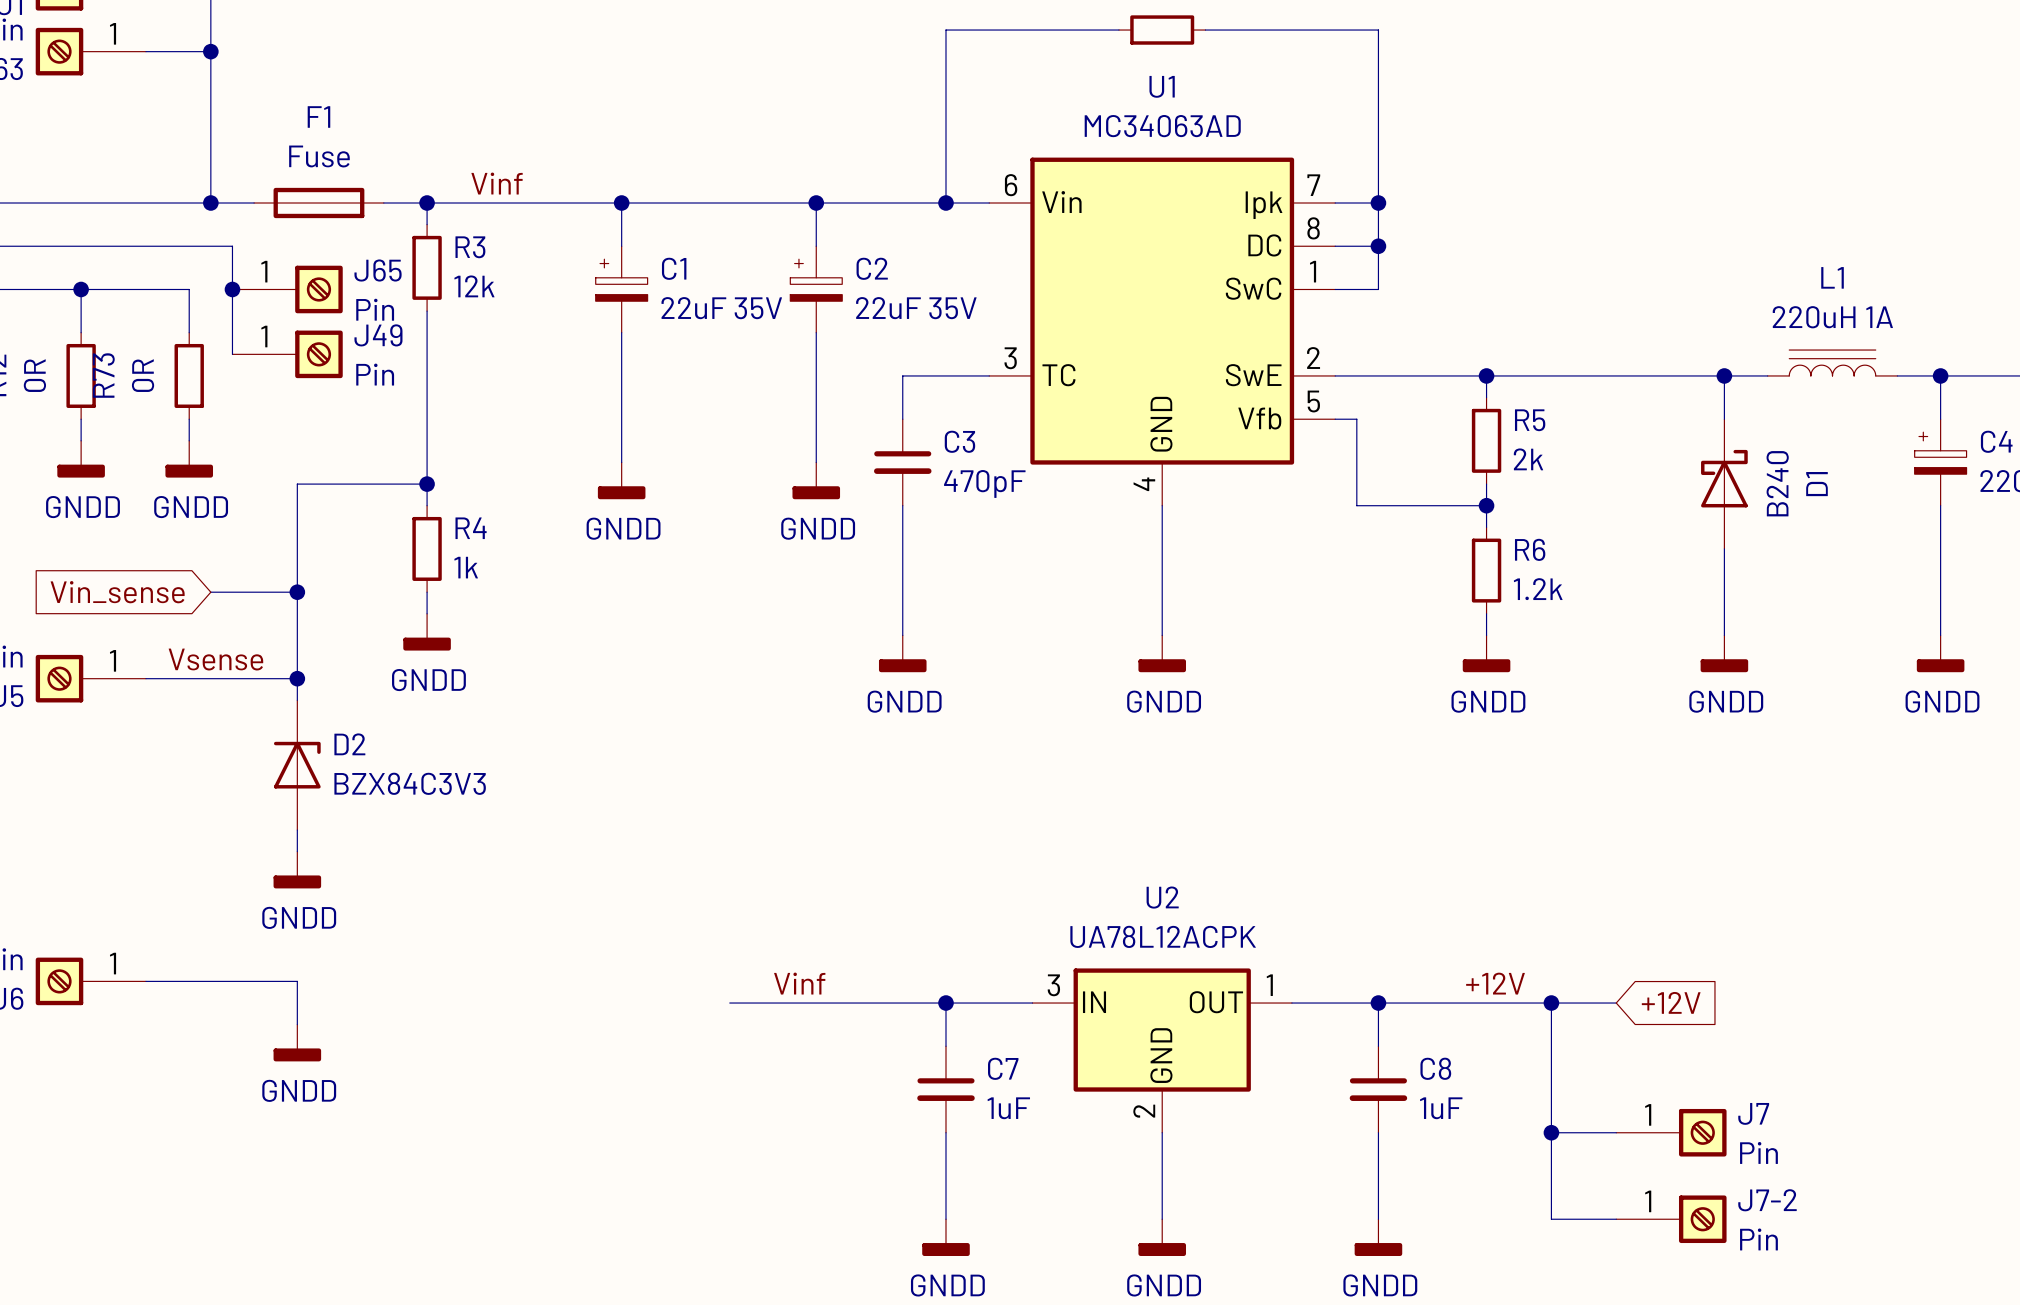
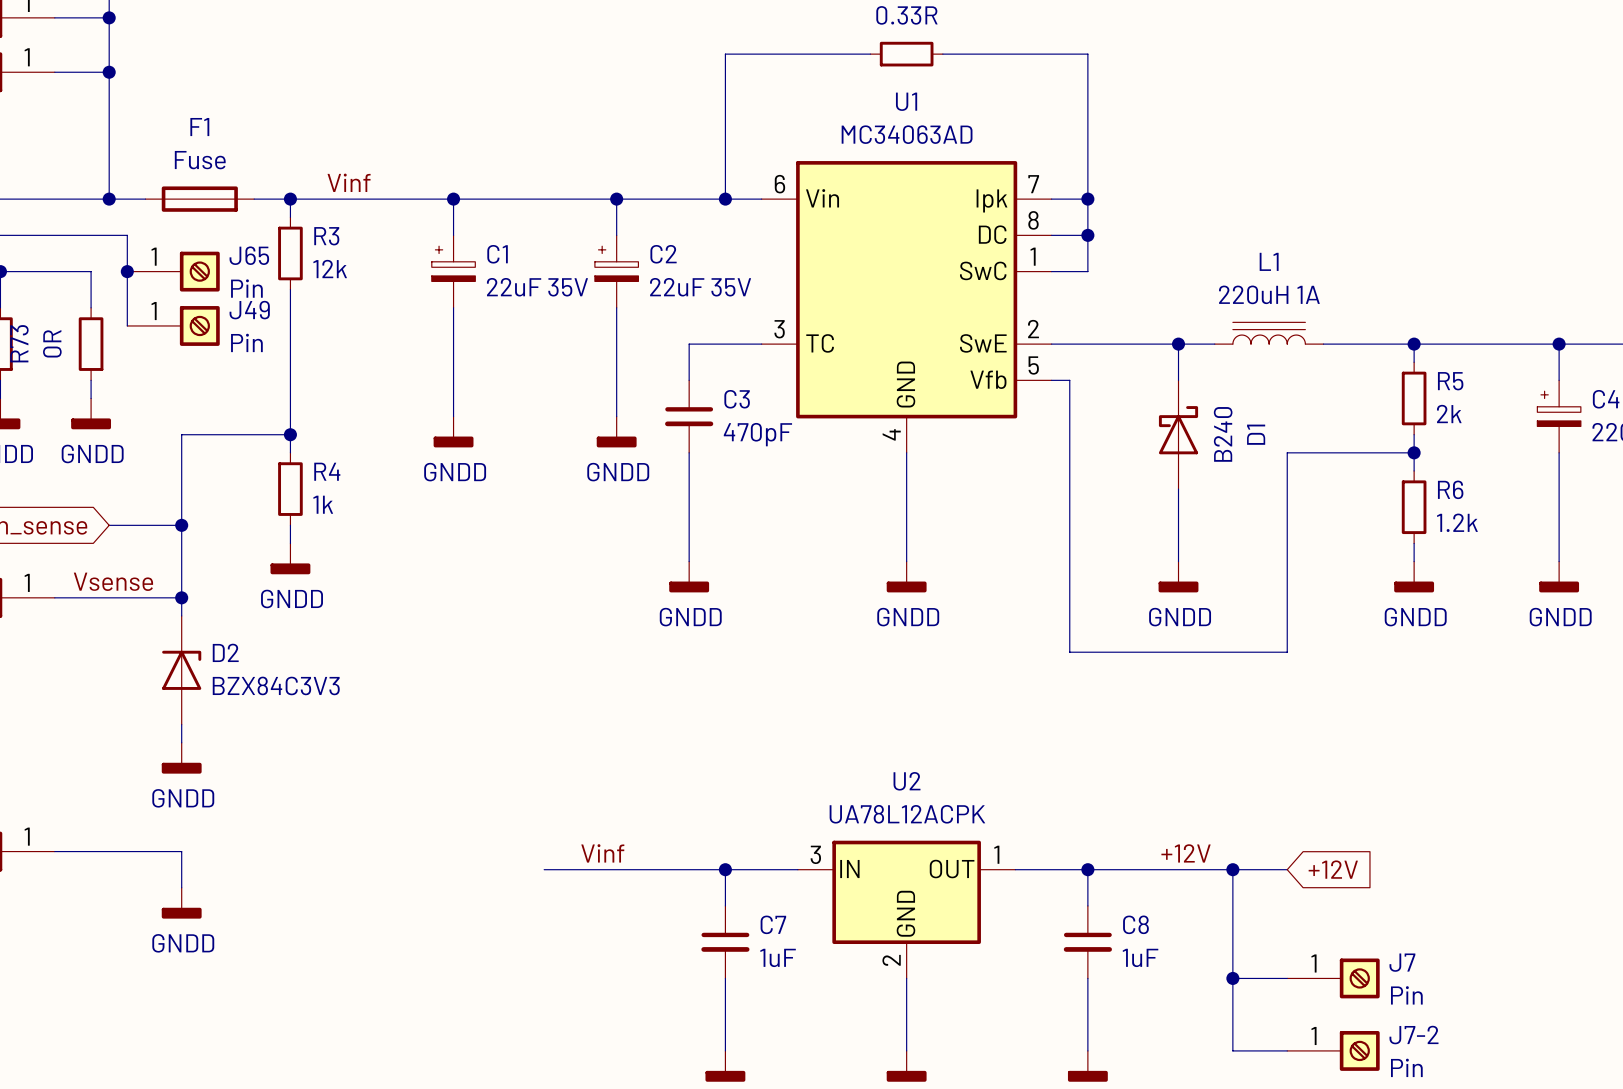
L1 position: (1832, 363) -> (1269, 333)
wire: (1529, 375) (1659, 375) -> none
wire: (1724, 375) (1724, 419) -> (1414, 434) (1414, 470)
junction position: (1724, 375) -> (1414, 344)
wire: none -> (1522, 344) (1414, 344) (1414, 362)
R5 position: (1486, 440) -> (1414, 398)
D1 position: (1724, 484) -> (1178, 434)
wire: (1356, 505) (1486, 505) -> (1069, 452) (1069, 652) (1287, 652) (1287, 452) (1414, 452)
junction: (1486, 505) -> none
junction: none -> (1414, 452)
wire: none -> (1178, 489) (1178, 543)
wire: (1724, 548) (1724, 635) -> none
R6 position: (1486, 570) -> (1414, 507)
wire: none -> (1414, 543) (1414, 561)
power symbol position: GNDD (1724, 653) -> GNDD (1414, 576)

